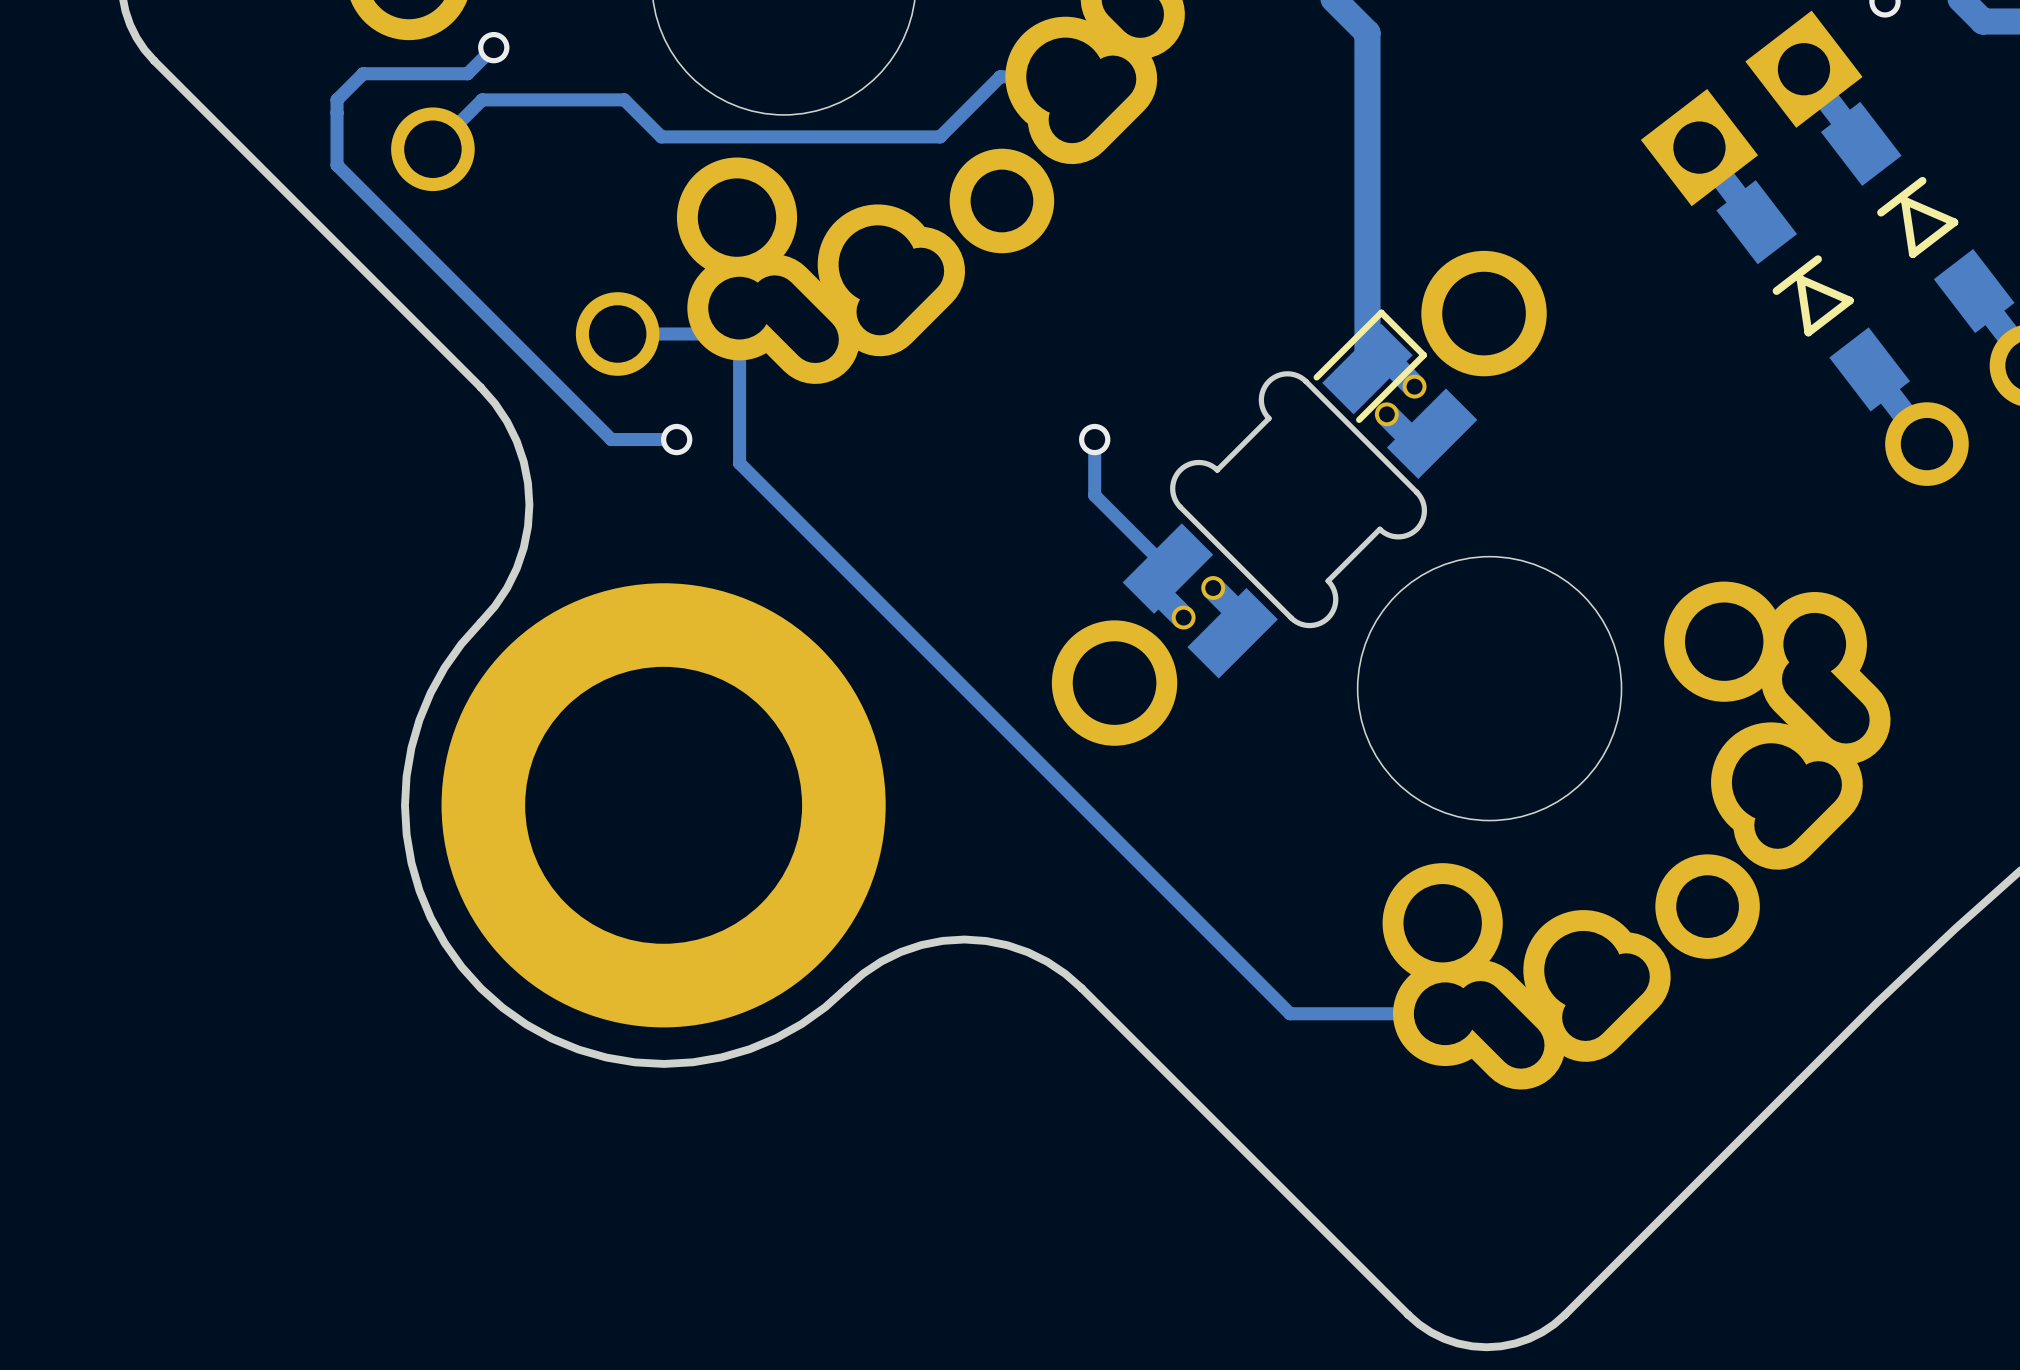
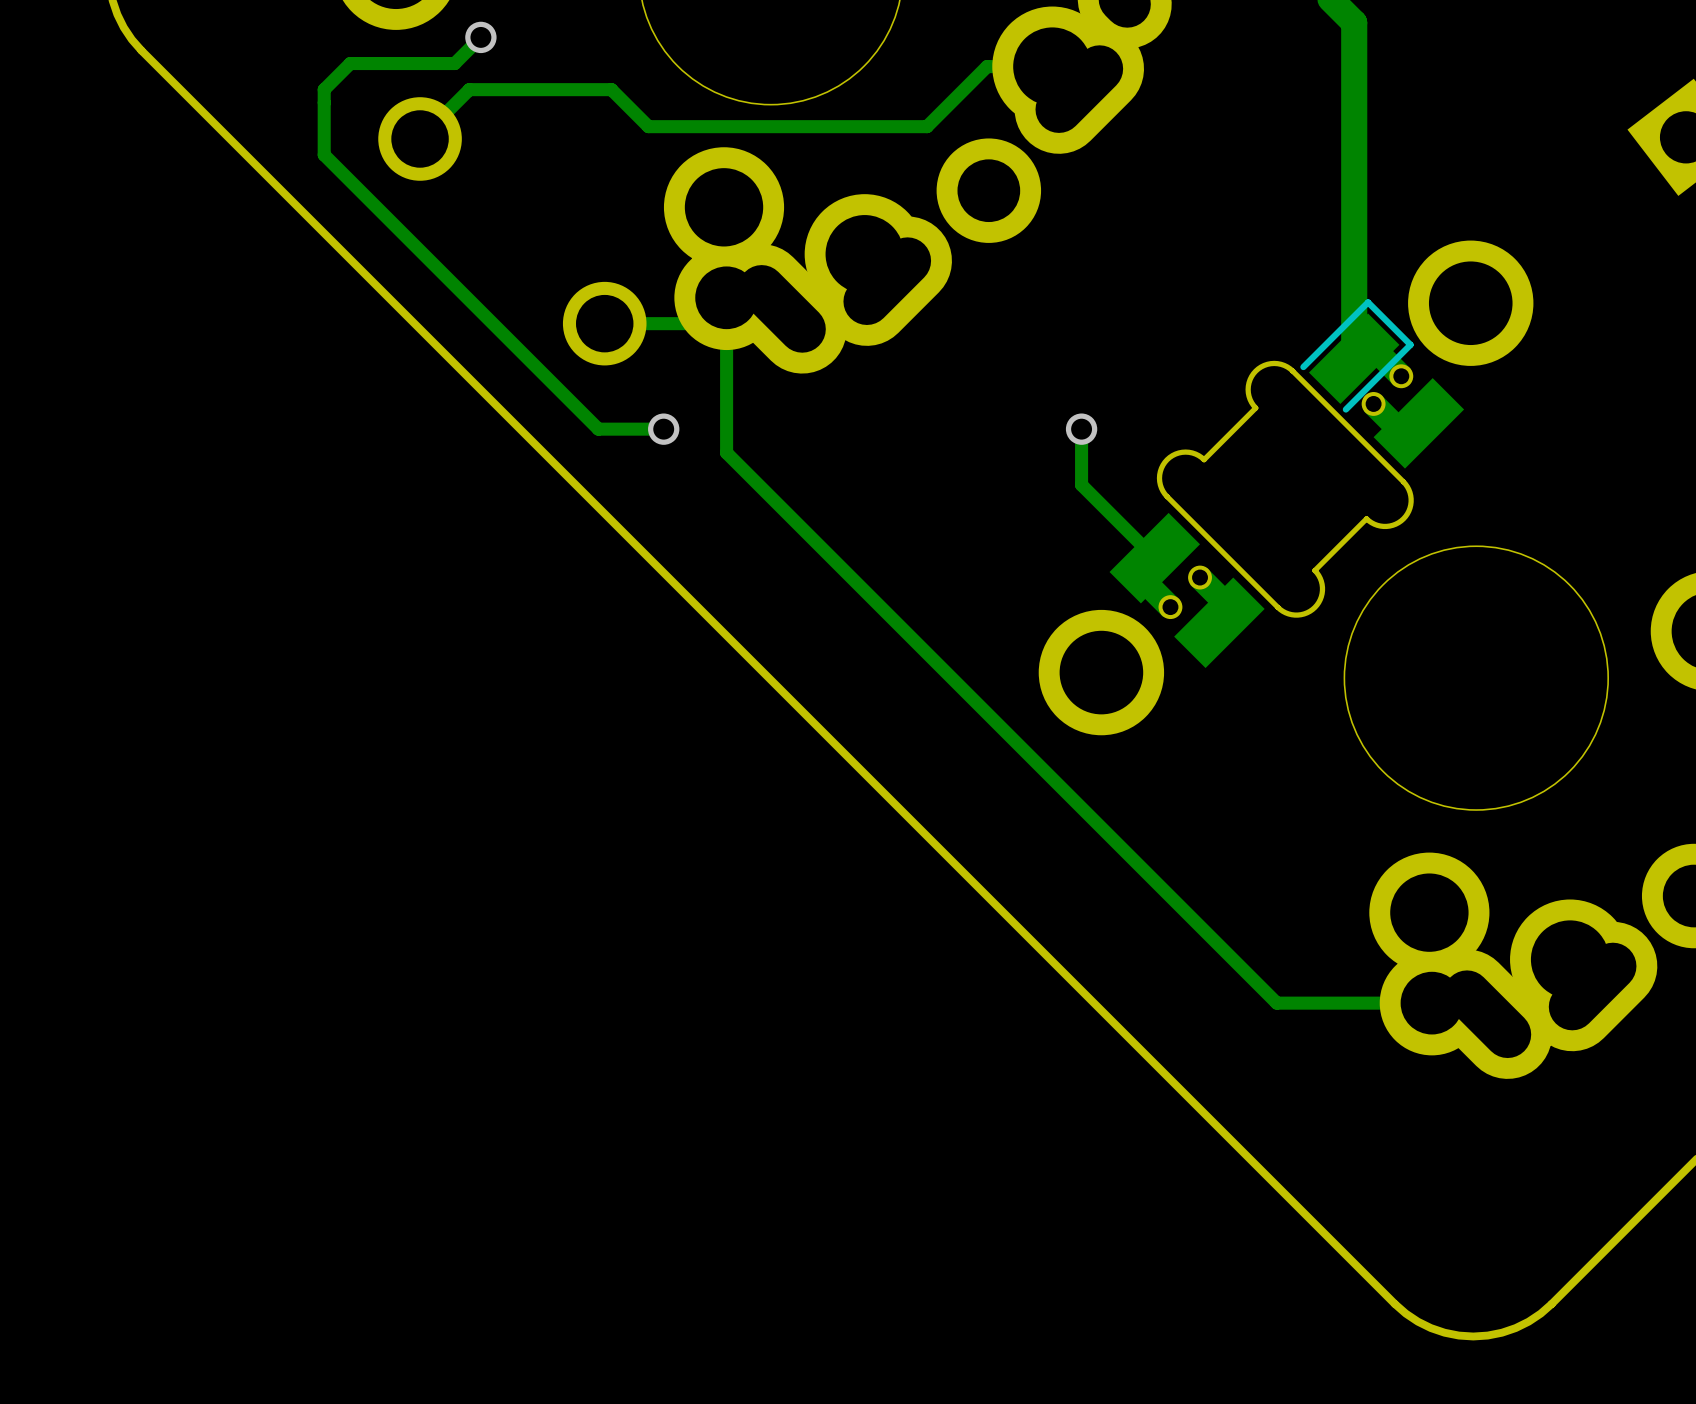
board edge: (480, 387) (495, 403) (516, 441) (528, 483) (528, 526) (516, 568) (507, 587) (495, 606) (461, 644) (444, 667) (430, 693) (419, 719) (411, 747) (406, 776) (404, 805) (406, 834) (411, 863) (419, 890) (430, 917) (444, 943) (461, 966) (480, 988) (502, 1007) (526, 1024) (551, 1038) (578, 1049) (606, 1057) (635, 1062) (664, 1063) (693, 1062) (721, 1057) (749, 1049) (776, 1038) (801, 1023) (825, 1007) (863, 973) (881, 961) (900, 951) (942, 940) (986, 940) (1007, 945) (1047, 961) (1081, 988) -> (467, 376) (1068, 977)
part: (663, 805) -> none

